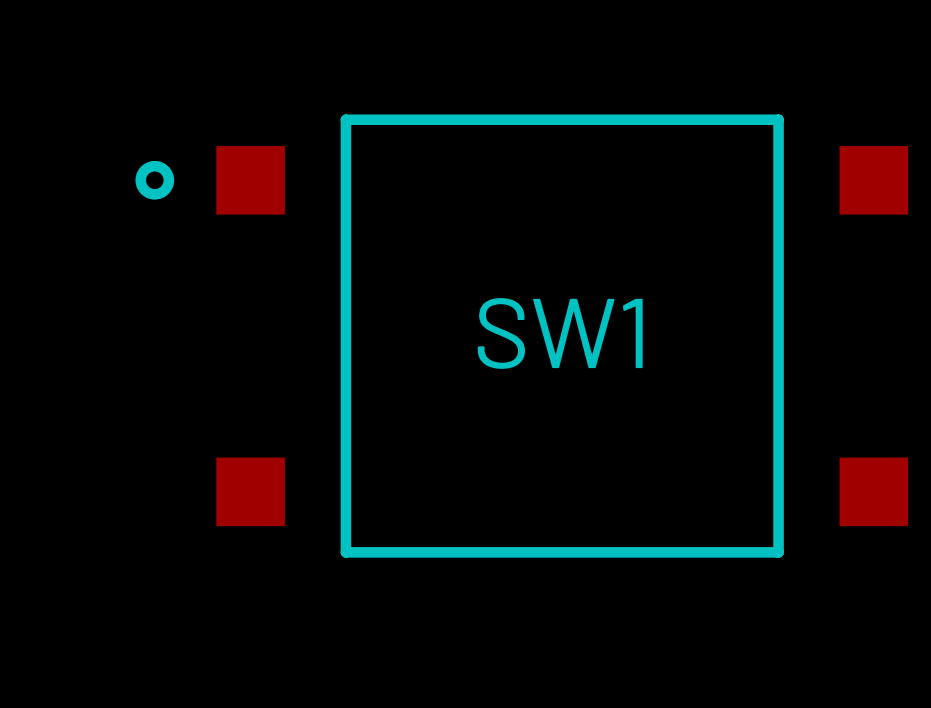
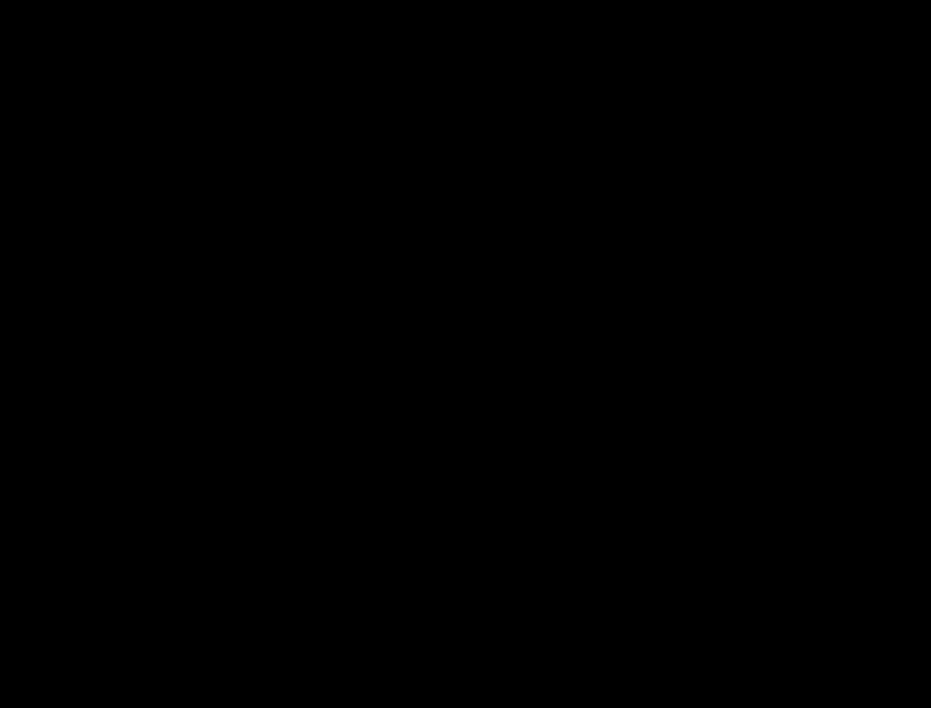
SW1: (521, 336) -> none

